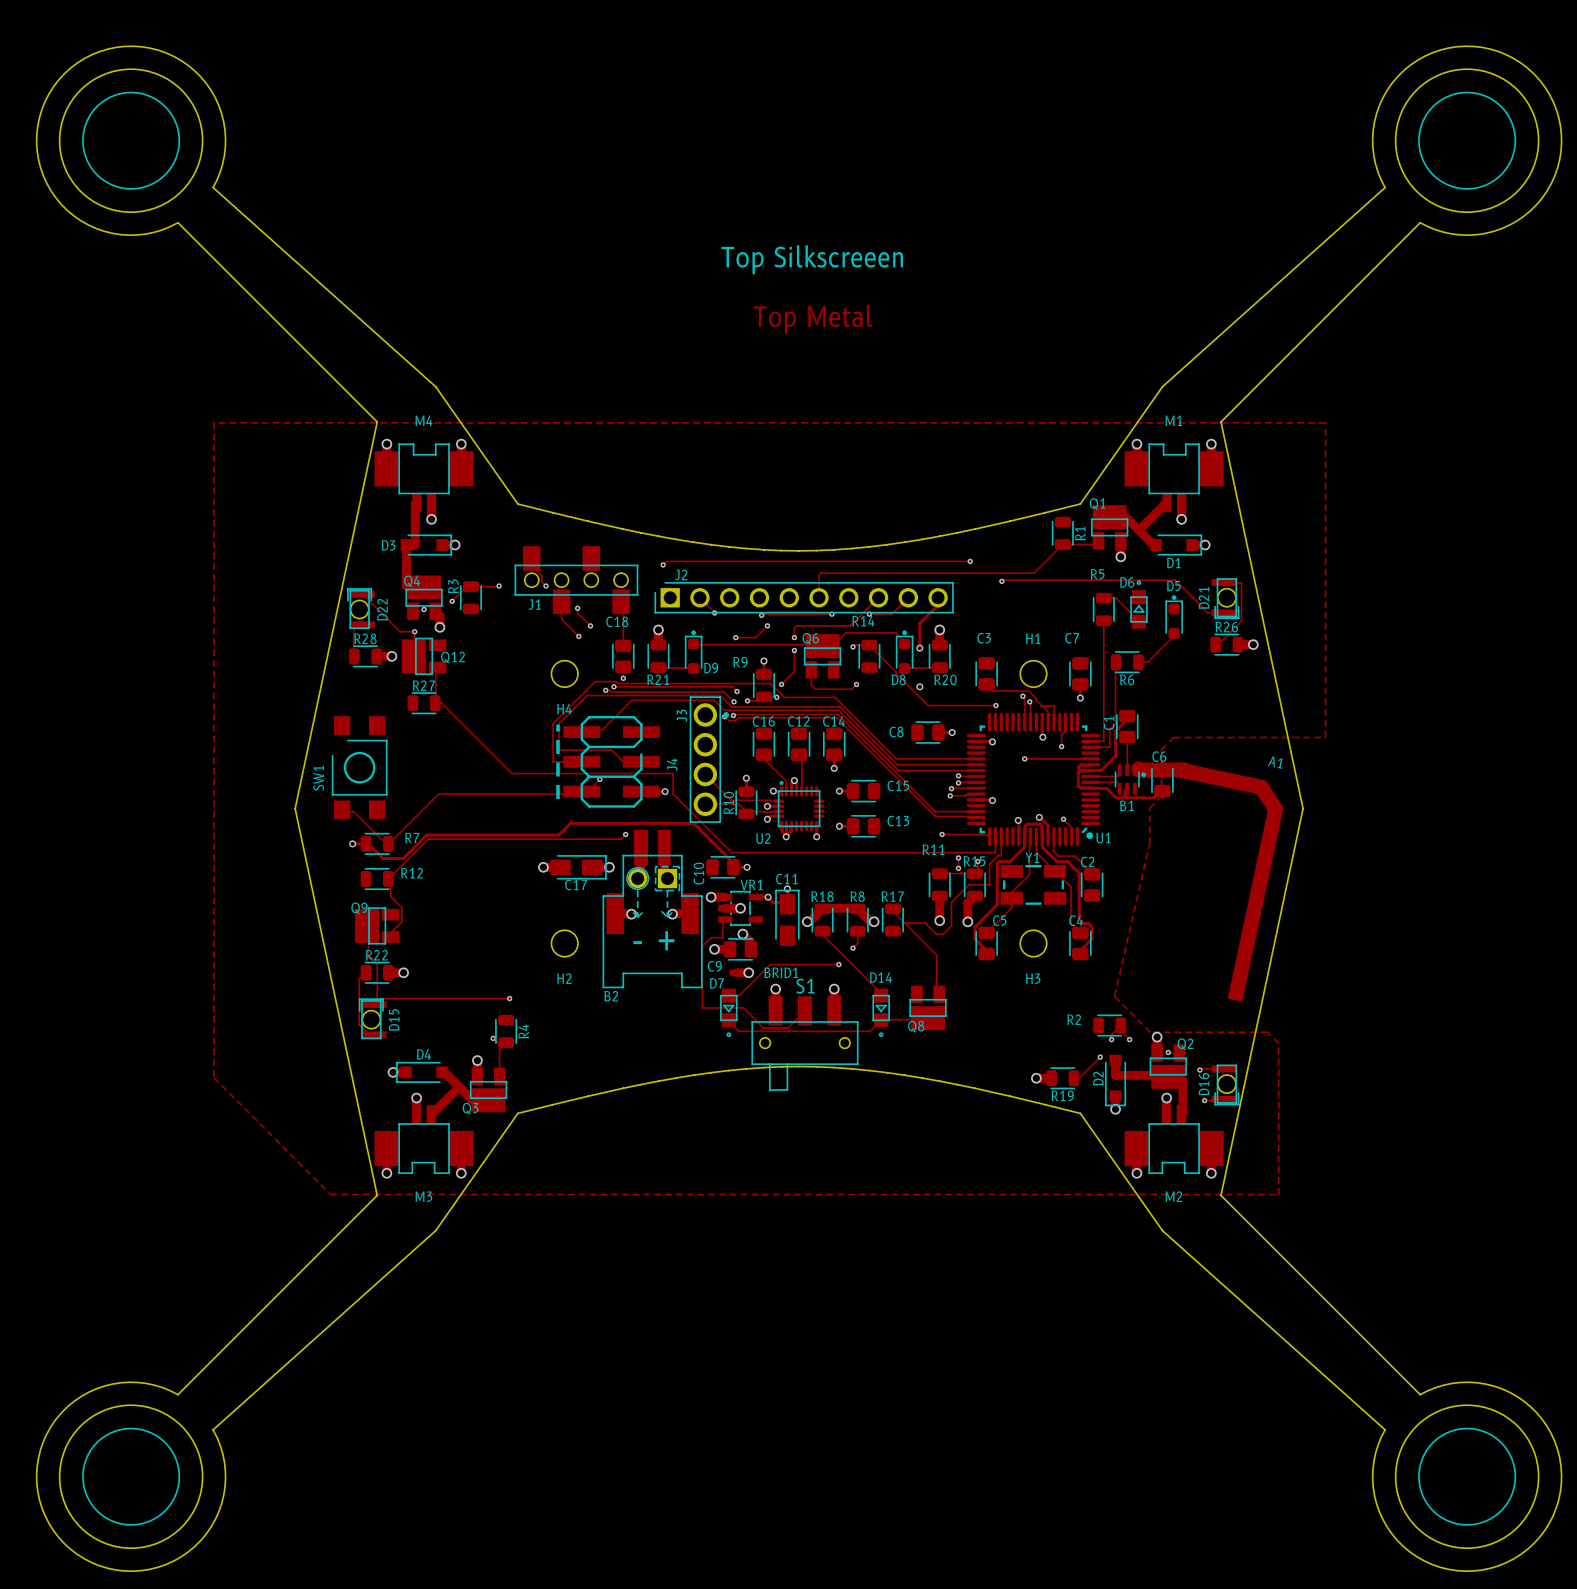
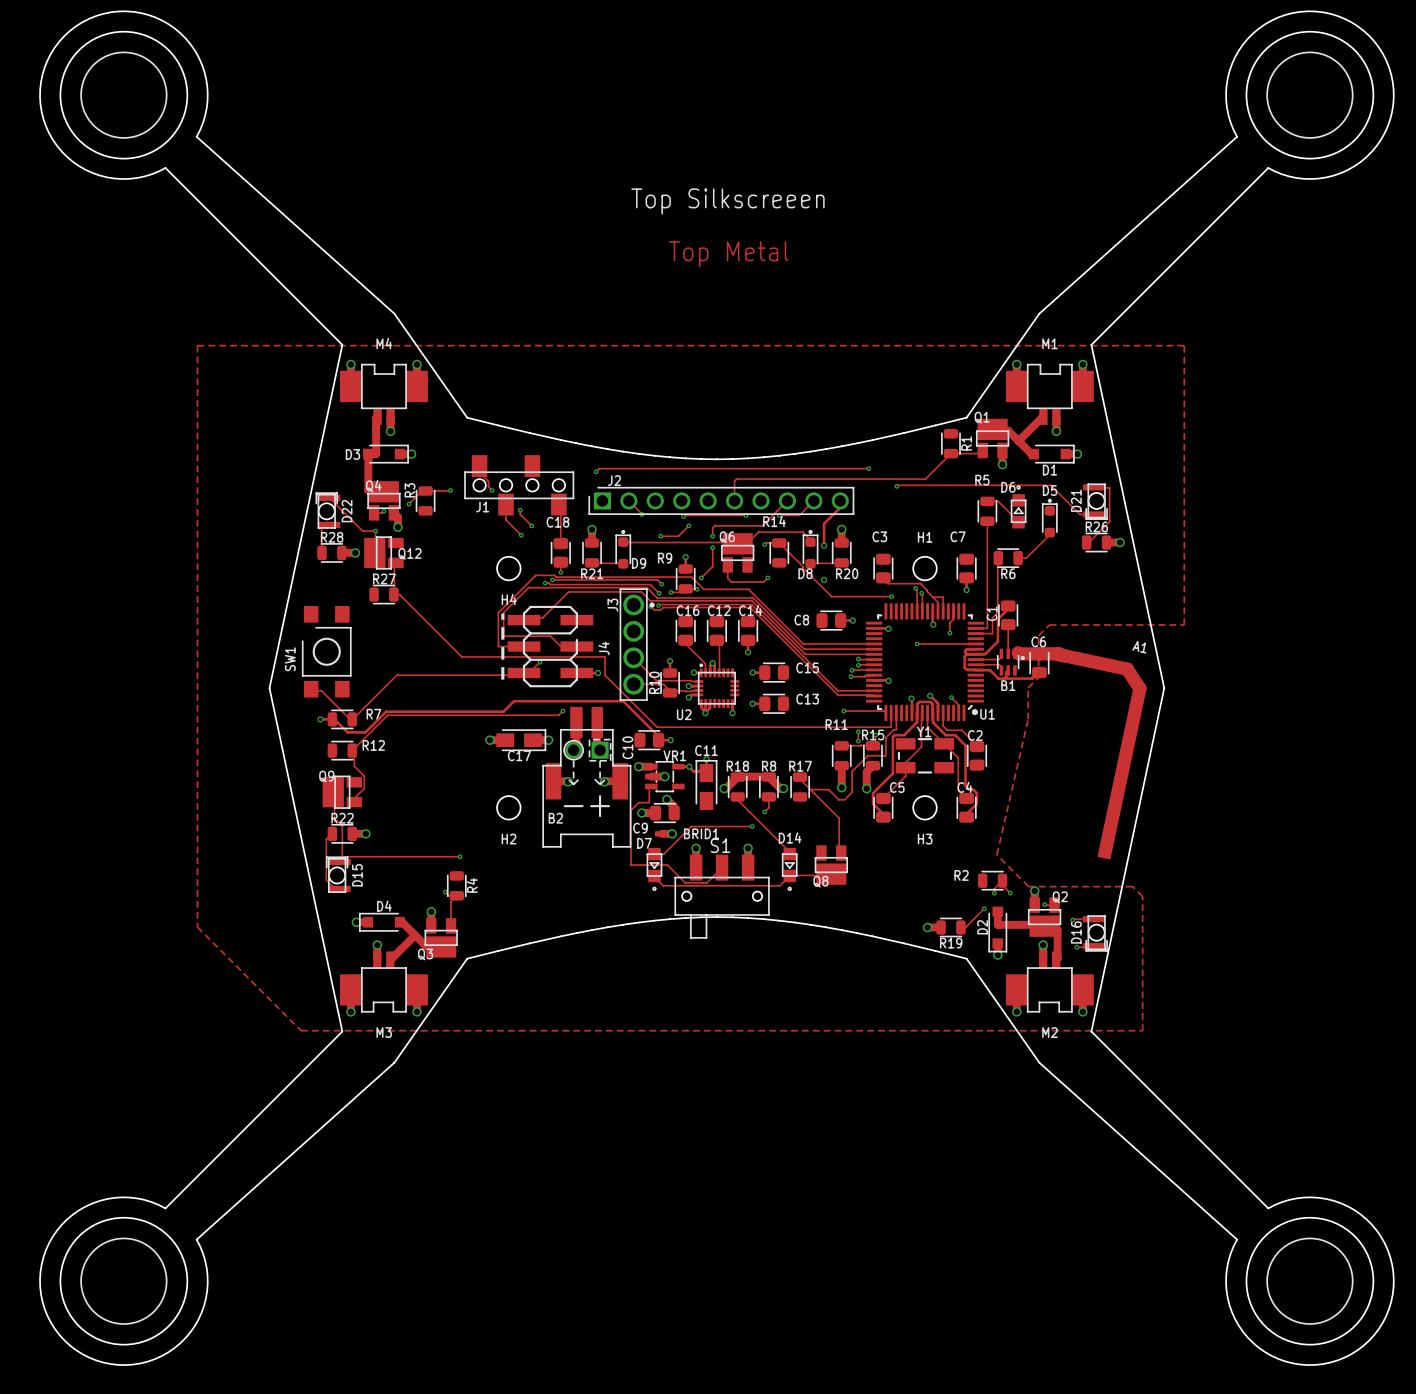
B2 name position: B2 (611, 996) -> B2 (555, 818)

